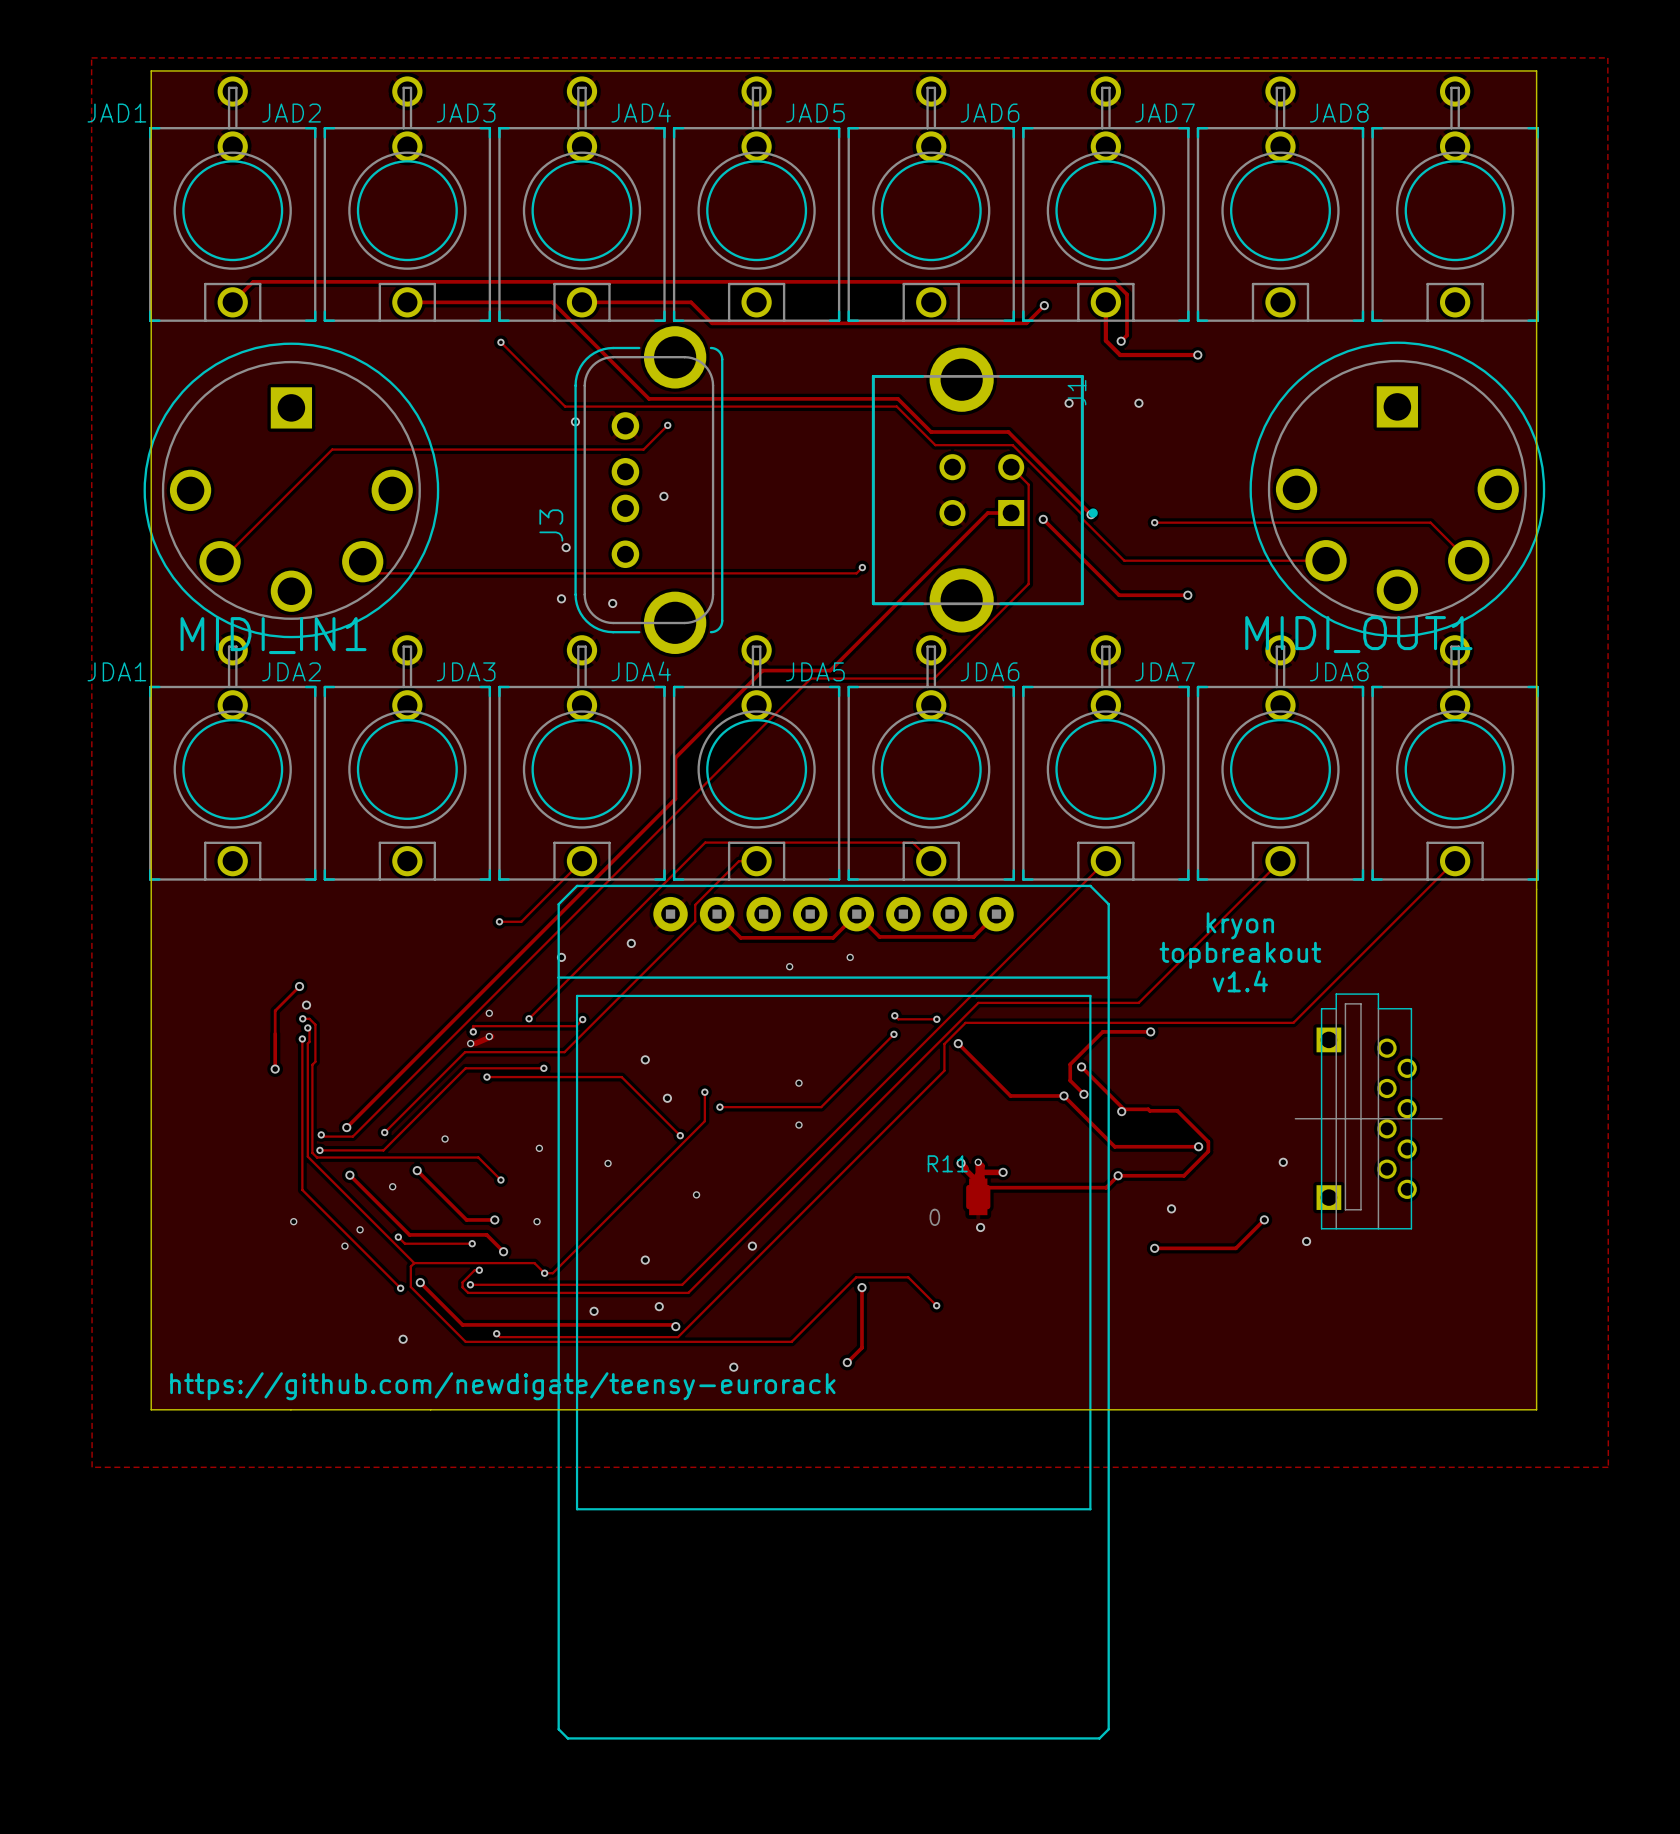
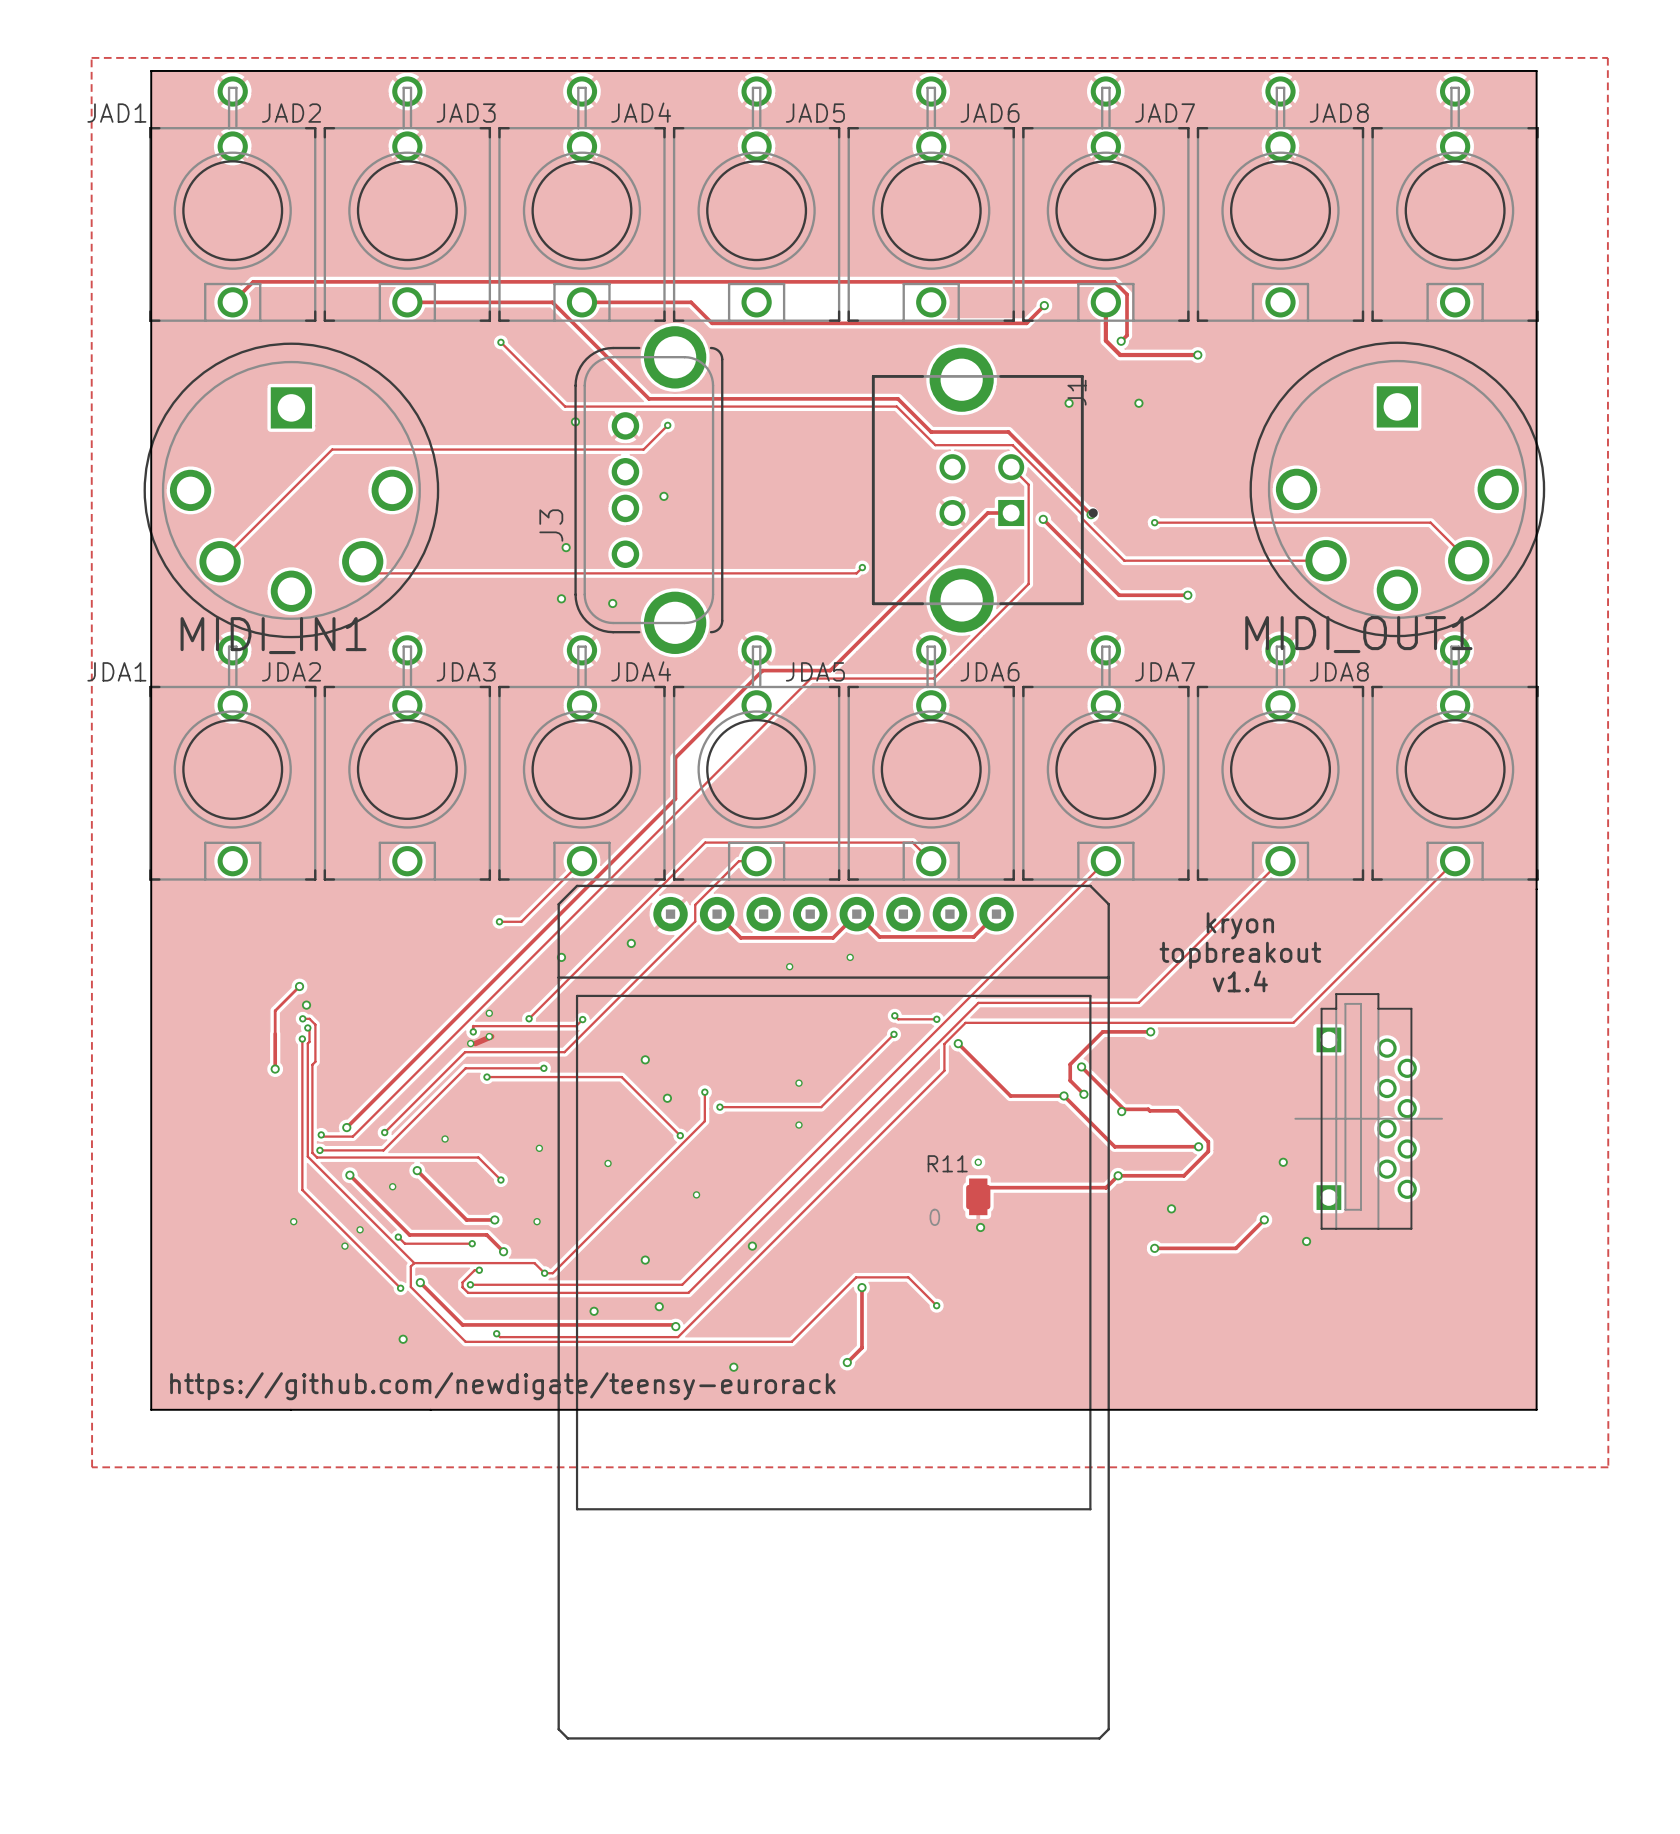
track: (961, 1163) (974, 1178) (981, 1172) (1003, 1172) -> none
via: (961, 1163) -> none
via: (1003, 1172) -> none
track: (978, 1175) (978, 1162) (981, 1165) (981, 1178) -> none

